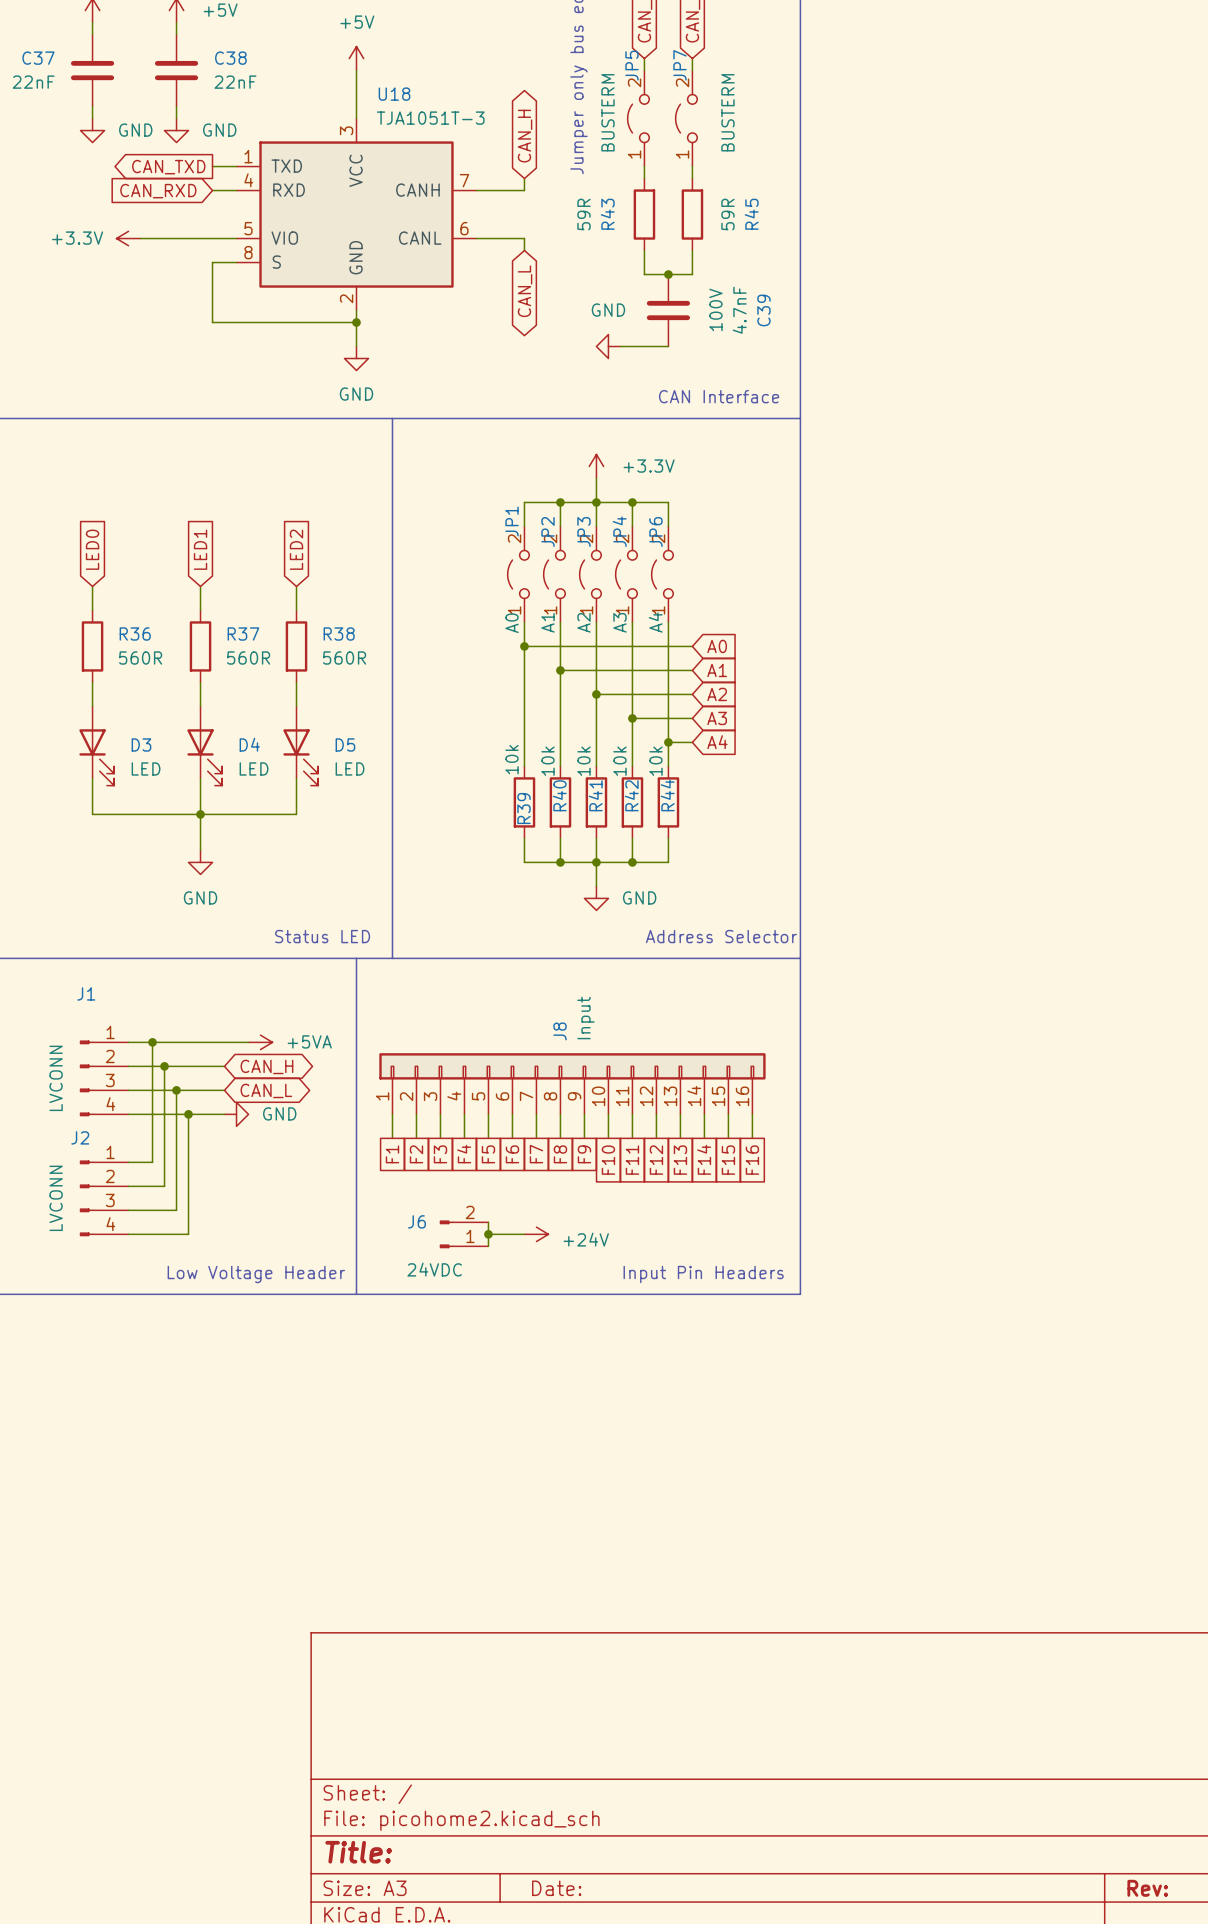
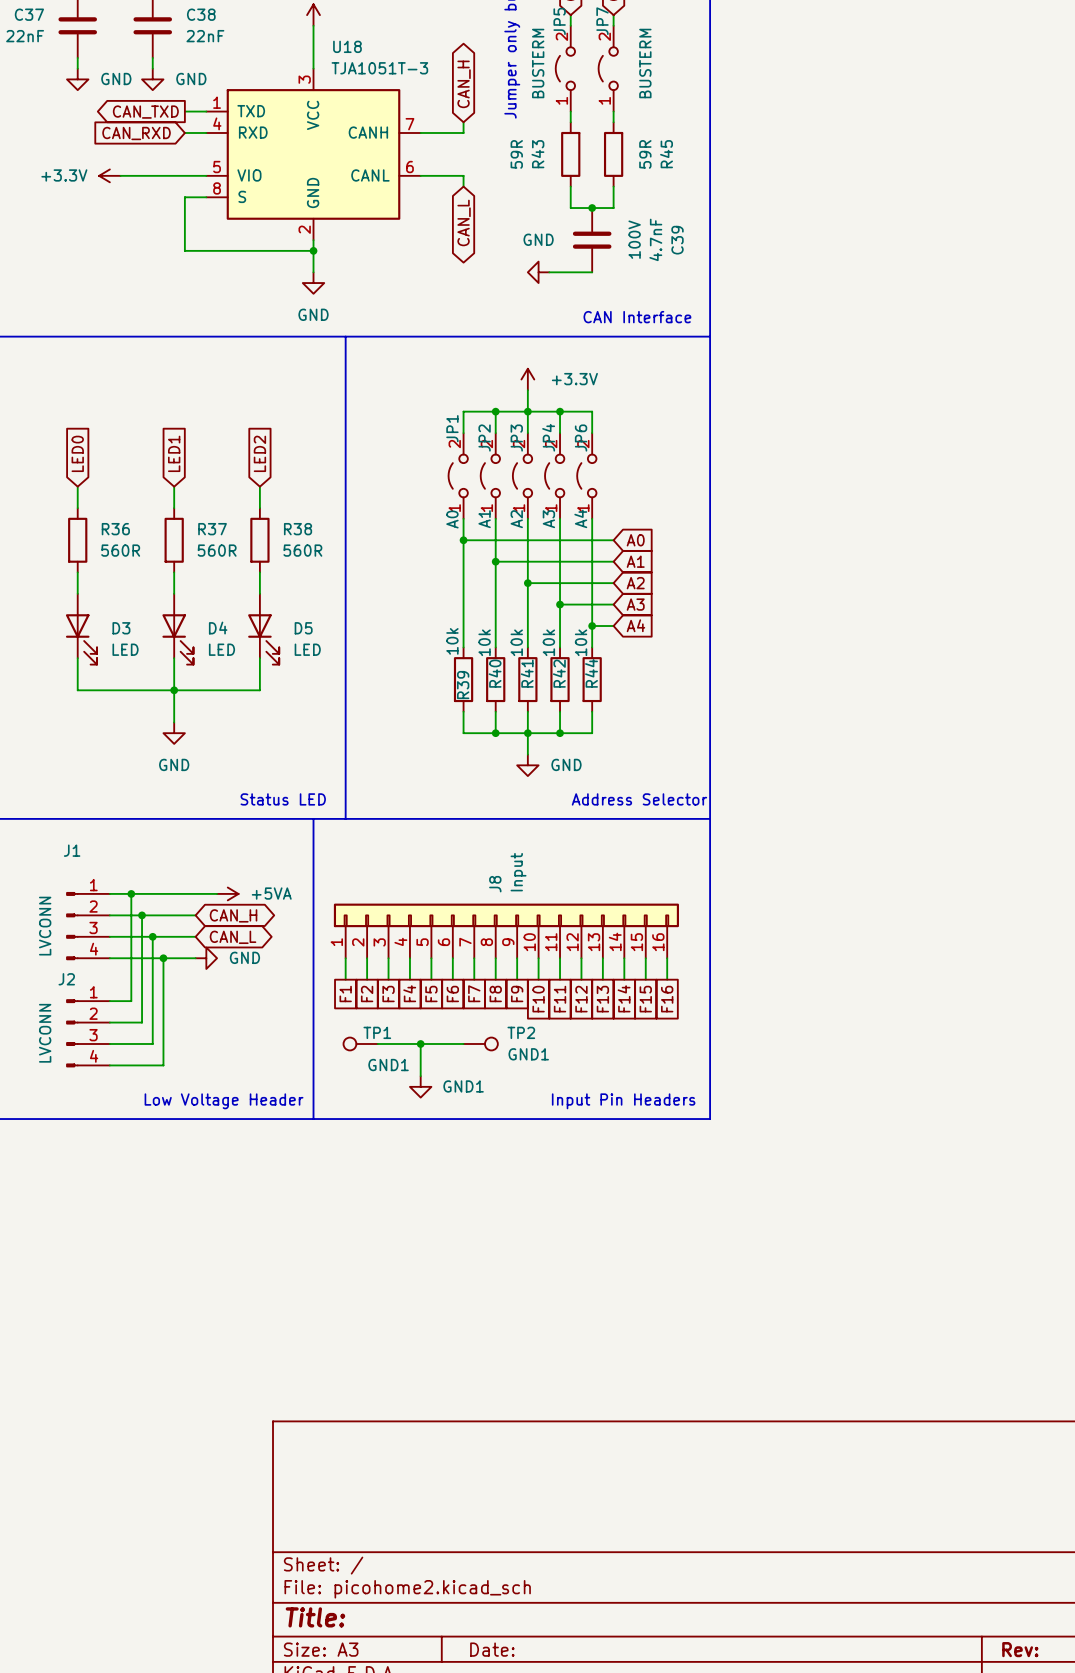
TP1: none -> GND1 (360, 1043)
wire: none -> (377, 1043) (463, 1043)
wire: none -> (420, 1043) (420, 1076)
TP2: none -> GND1 (480, 1043)
wire: (488, 1222) (488, 1246) -> none
J6: 24VDC (464, 1234) -> none
wire: (488, 1234) (524, 1234) -> none
junction position: (488, 1234) -> (420, 1043)
power symbol: +24V (536, 1234) -> none
power symbol: none -> GND1 (420, 1086)

